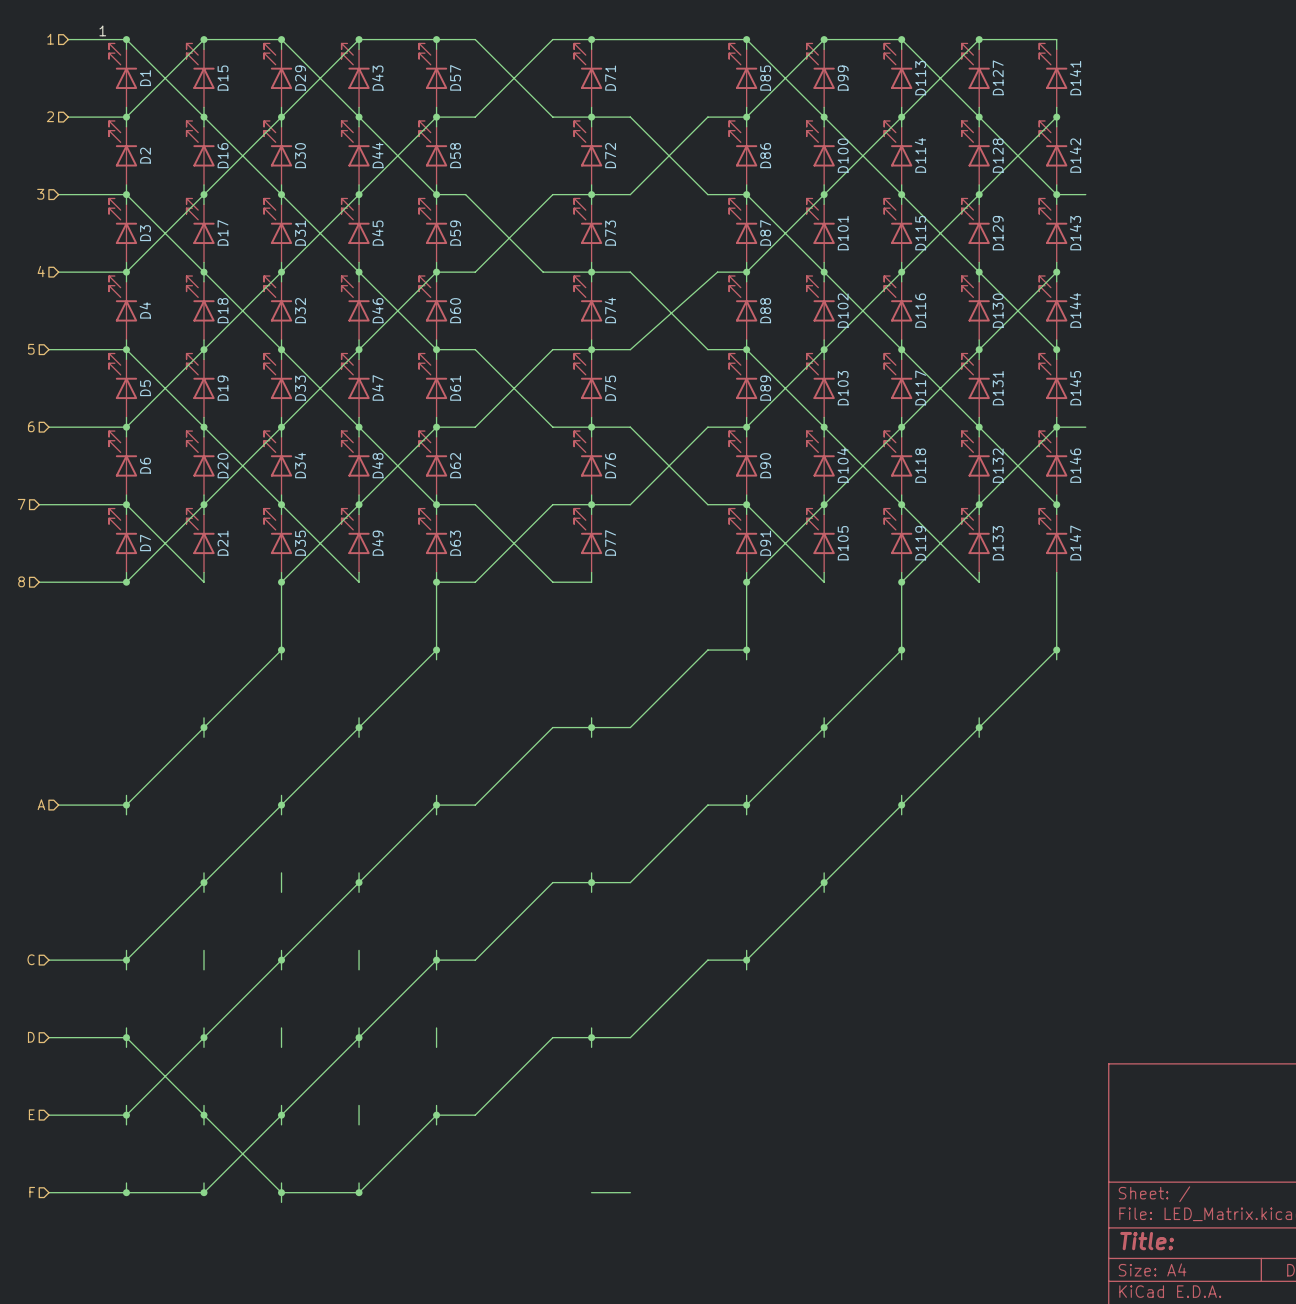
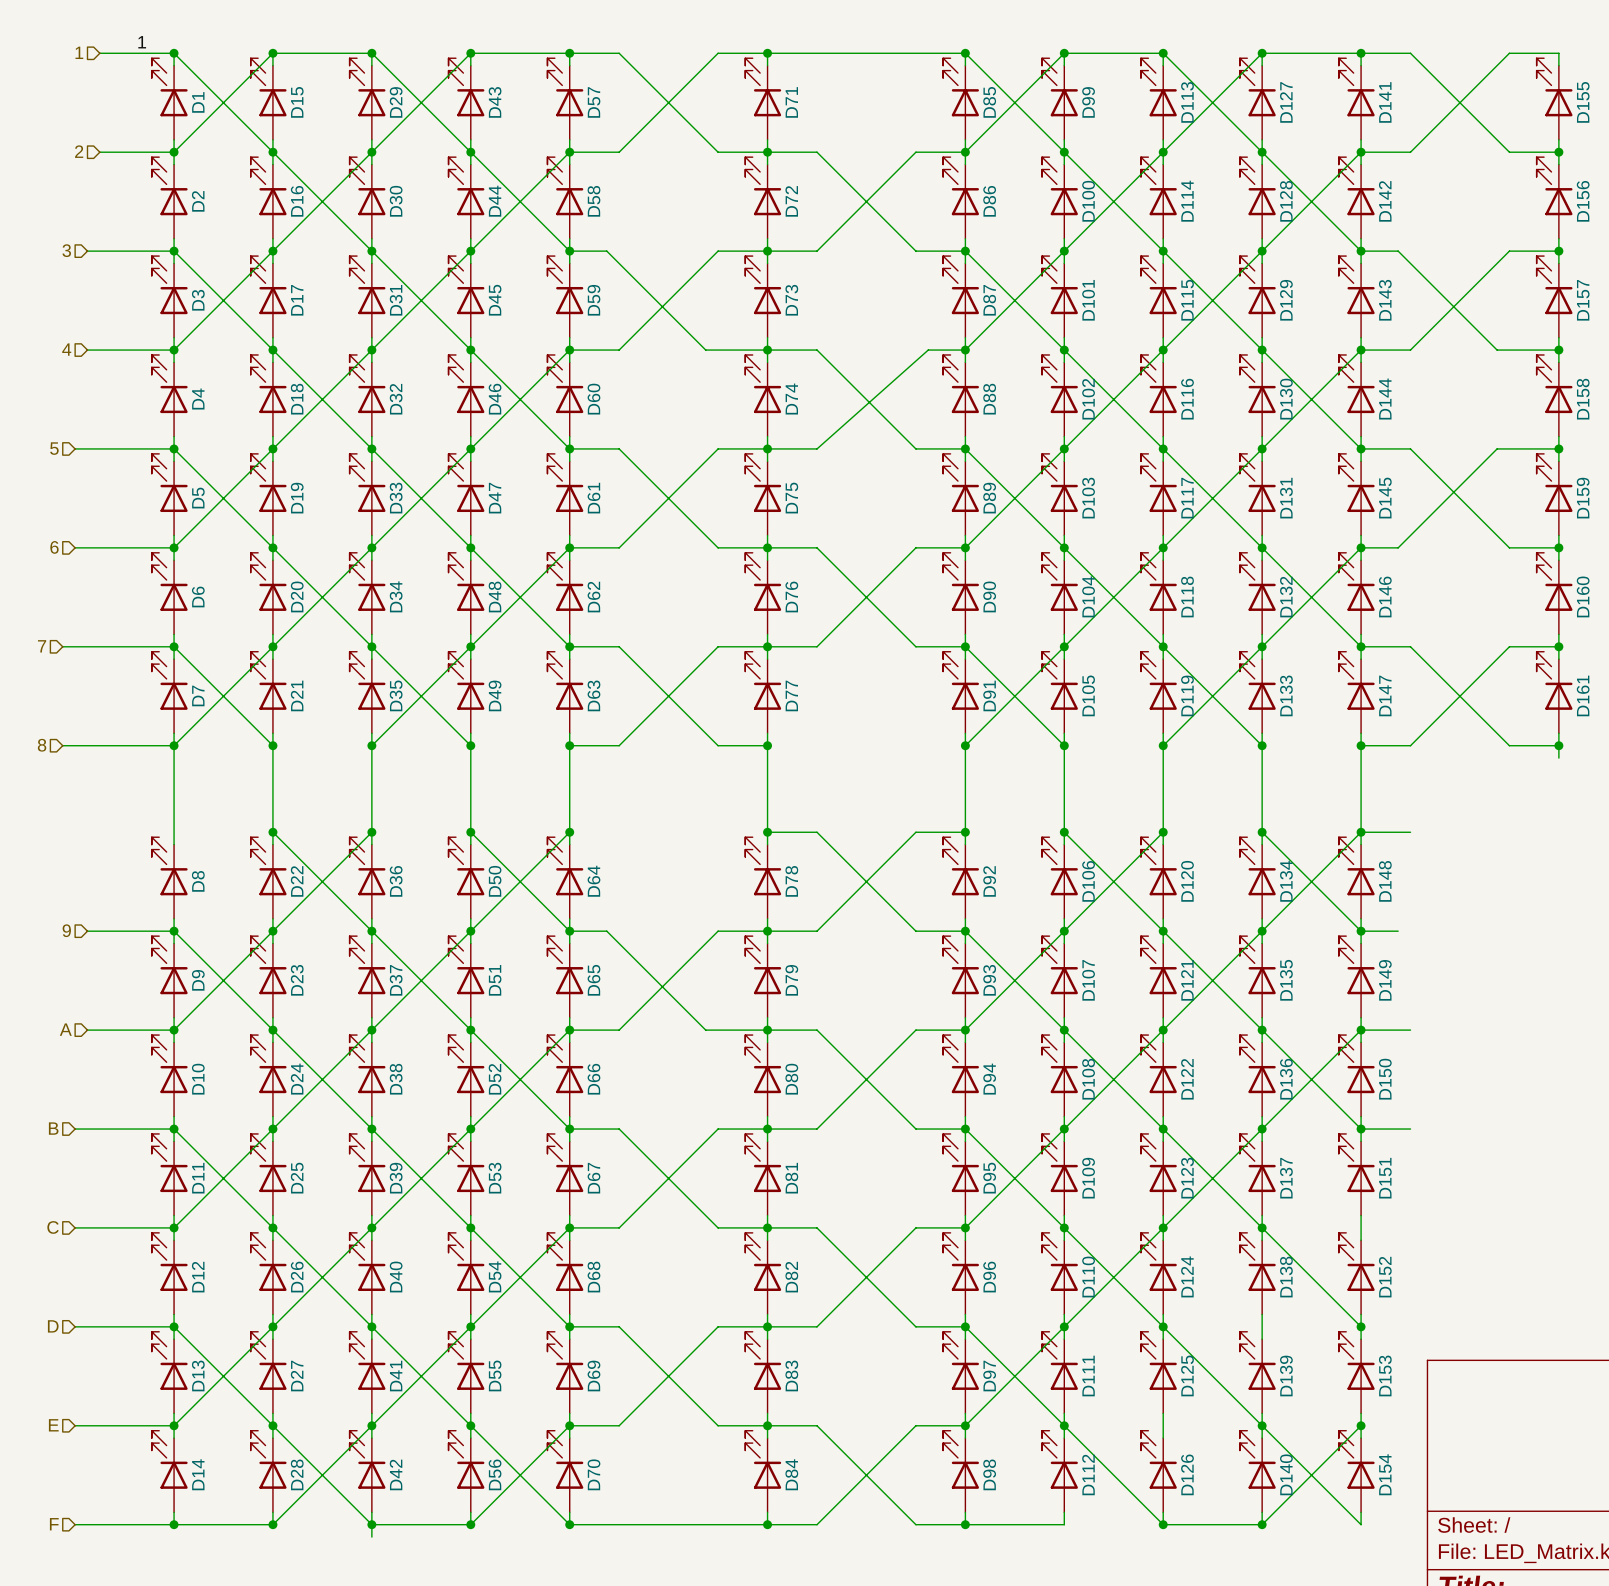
wire: none -> (1361, 53) (1410, 53) (1509, 152) (1558, 152)
junction: none -> (1361, 53)
wire: none -> (1558, 65) (1558, 53) (1509, 53) (1410, 152) (1361, 152)
D155: none -> (1554, 99)
wire: none -> (1558, 139) (1558, 164)
junction: none -> (1558, 152)
D156: none -> (1554, 197)
wire: none -> (1558, 238) (1558, 263)
wire: none -> (1398, 251) (1497, 350) (1558, 350)
wire: none -> (1558, 251) (1509, 251) (1410, 350) (1361, 350)
junction: none -> (1558, 251)
D157: none -> (1554, 296)
wire: none -> (1558, 337) (1558, 362)
junction: none -> (1558, 350)
D158: none -> (1554, 395)
wire: none -> (1558, 436) (1558, 461)
wire: none -> (1361, 448) (1410, 448) (1509, 547) (1558, 547)
wire: none -> (1558, 448) (1497, 448) (1398, 547)
junction: none -> (1558, 448)
D159: none -> (1554, 494)
wire: none -> (1558, 535) (1558, 560)
junction: none -> (1558, 547)
D160: none -> (1554, 593)
wire: none -> (1558, 634) (1558, 659)
wire: none -> (1361, 646) (1410, 646) (1509, 745) (1558, 745)
wire: none -> (1558, 646) (1509, 646) (1410, 745) (1361, 745)
junction: none -> (1558, 646)
D161: none -> (1554, 692)
wire: none -> (1558, 733) (1558, 758)
wire: none -> (174, 745) (174, 844)
wire: none -> (272, 745) (272, 844)
junction: none -> (272, 745)
wire: none -> (470, 745) (470, 844)
junction: none -> (470, 745)
wire: none -> (767, 745) (767, 844)
junction: none -> (767, 745)
wire: none -> (1064, 745) (1064, 844)
junction: none -> (1064, 745)
wire: none -> (1262, 745) (1262, 844)
junction: none -> (1262, 745)
junction: none -> (1361, 745)
junction: none -> (1558, 745)
wire: none -> (272, 832) (569, 1129) (619, 1129) (718, 1227) (817, 1227) (915, 1326) (965, 1326) (1163, 1524)
junction: none -> (272, 832)
wire: none -> (470, 832) (569, 931) (606, 931) (705, 1030) (817, 1030) (915, 1129) (965, 1129) (1361, 1524) (1361, 1512)
junction: none -> (470, 832)
wire: none -> (767, 832) (817, 832) (915, 931) (965, 931) (1361, 1326)
junction: none -> (767, 832)
wire: none -> (1064, 832) (1361, 1129) (1410, 1129)
junction: none -> (1064, 832)
wire: none -> (1262, 832) (1361, 931) (1398, 931)
junction: none -> (1262, 832)
wire: none -> (1361, 832) (1410, 832)
D8: none -> (169, 878)
D22: none -> (268, 878)
D36: none -> (367, 878)
D50: none -> (466, 878)
D64: none -> (565, 878)
D78: none -> (763, 878)
D92: none -> (961, 878)
D106: none -> (1059, 878)
D120: none -> (1158, 878)
D134: none -> (1257, 878)
D148: none -> (1356, 878)
wire: none -> (174, 918) (174, 943)
wire: none -> (371, 918) (371, 943)
wire: none -> (569, 918) (569, 943)
wire: none -> (965, 918) (965, 943)
wire: none -> (1163, 918) (1163, 943)
wire: none -> (1361, 918) (1361, 943)
hierarchical label: none -> 9 (66, 930)
wire: none -> (87, 931) (174, 931) (569, 1326) (619, 1326) (718, 1425) (817, 1425) (915, 1524) (1064, 1524) (1064, 1512)
junction: none -> (174, 931)
junction: none -> (371, 931)
junction: none -> (569, 931)
junction: none -> (965, 931)
junction: none -> (1163, 931)
junction: none -> (1361, 931)
D9: none -> (169, 976)
D23: none -> (268, 976)
D37: none -> (367, 976)
D51: none -> (466, 976)
D65: none -> (565, 976)
D79: none -> (763, 976)
D93: none -> (961, 976)
D107: none -> (1059, 976)
D121: none -> (1158, 976)
D135: none -> (1257, 976)
D149: none -> (1356, 976)
wire: none -> (272, 1017) (272, 1042)
wire: none -> (470, 1017) (470, 1042)
wire: none -> (767, 1017) (767, 1042)
wire: none -> (1064, 1017) (1064, 1042)
wire: none -> (1262, 1017) (1262, 1042)
wire: none -> (1361, 1017) (1361, 1042)
junction: none -> (272, 1030)
junction: none -> (470, 1030)
junction: none -> (767, 1030)
junction: none -> (1064, 1030)
junction: none -> (1262, 1030)
junction: none -> (1361, 1030)
wire: none -> (1410, 1030) (1361, 1030) (965, 1425) (915, 1425) (817, 1524)
D10: none -> (169, 1075)
D24: none -> (268, 1075)
D38: none -> (367, 1075)
D52: none -> (466, 1075)
D66: none -> (565, 1075)
D80: none -> (763, 1075)
D94: none -> (961, 1075)
D108: none -> (1059, 1075)
D122: none -> (1158, 1075)
D136: none -> (1257, 1075)
D150: none -> (1356, 1075)
wire: none -> (174, 1116) (174, 1141)
wire: none -> (569, 1116) (569, 1141)
wire: none -> (965, 1116) (965, 1141)
wire: none -> (1163, 1116) (1163, 1141)
wire: none -> (1262, 1116) (1262, 1141)
wire: none -> (1361, 1116) (1361, 1141)
hierarchical label: none -> B (53, 1128)
wire: none -> (75, 1129) (174, 1129) (569, 1524)
junction: none -> (174, 1129)
junction: none -> (371, 1129)
junction: none -> (569, 1129)
junction: none -> (965, 1129)
junction: none -> (1163, 1129)
junction: none -> (1262, 1129)
junction: none -> (1361, 1129)
D11: none -> (169, 1174)
D25: none -> (268, 1174)
D39: none -> (367, 1174)
D53: none -> (466, 1174)
D67: none -> (565, 1174)
D81: none -> (763, 1174)
D95: none -> (961, 1174)
D109: none -> (1059, 1174)
D123: none -> (1158, 1174)
D137: none -> (1257, 1174)
D151: none -> (1356, 1174)
wire: none -> (767, 1215) (767, 1240)
wire: none -> (1064, 1215) (1064, 1240)
wire: none -> (1163, 1215) (1163, 1240)
wire: none -> (1262, 1215) (1262, 1240)
wire: none -> (1361, 1215) (1361, 1240)
junction: none -> (272, 1227)
junction: none -> (470, 1227)
junction: none -> (767, 1227)
junction: none -> (1064, 1227)
junction: none -> (1163, 1227)
junction: none -> (1262, 1227)
D12: none -> (169, 1273)
D26: none -> (268, 1273)
D40: none -> (367, 1273)
D54: none -> (466, 1273)
D68: none -> (565, 1273)
D82: none -> (763, 1273)
D96: none -> (961, 1273)
D110: none -> (1059, 1273)
D124: none -> (1158, 1273)
D138: none -> (1257, 1273)
D152: none -> (1356, 1273)
wire: none -> (965, 1314) (965, 1339)
wire: none -> (1064, 1314) (1064, 1339)
wire: none -> (1163, 1314) (1163, 1339)
wire: none -> (1262, 1314) (1262, 1339)
wire: none -> (1361, 1314) (1361, 1339)
junction: none -> (371, 1326)
junction: none -> (569, 1326)
junction: none -> (965, 1326)
junction: none -> (1064, 1326)
junction: none -> (1163, 1326)
junction: none -> (1361, 1326)
D13: none -> (169, 1372)
D27: none -> (268, 1372)
D41: none -> (367, 1372)
D55: none -> (466, 1372)
D69: none -> (565, 1372)
D83: none -> (763, 1372)
D97: none -> (961, 1372)
D111: none -> (1059, 1372)
D125: none -> (1158, 1372)
D139: none -> (1257, 1372)
D153: none -> (1356, 1372)
wire: none -> (767, 1413) (767, 1438)
wire: none -> (965, 1413) (965, 1438)
wire: none -> (1064, 1413) (1064, 1438)
wire: none -> (1163, 1413) (1163, 1438)
wire: none -> (1262, 1413) (1262, 1438)
wire: none -> (1361, 1413) (1361, 1438)
junction: none -> (470, 1425)
junction: none -> (767, 1425)
junction: none -> (965, 1425)
junction: none -> (1064, 1425)
junction: none -> (1262, 1425)
wire: none -> (1361, 1425) (1262, 1524)
junction: none -> (1361, 1425)
D14: none -> (169, 1471)
D28: none -> (268, 1471)
D42: none -> (367, 1471)
D56: none -> (466, 1471)
D70: none -> (565, 1471)
D84: none -> (763, 1471)
D98: none -> (961, 1471)
D112: none -> (1059, 1471)
D126: none -> (1158, 1471)
D140: none -> (1257, 1471)
D154: none -> (1356, 1471)
wire: none -> (569, 1512) (569, 1524)
wire: none -> (767, 1512) (767, 1524) (569, 1524)
wire: none -> (965, 1512) (965, 1524)
wire: none -> (1163, 1512) (1163, 1524)
wire: none -> (1262, 1512) (1262, 1524)
junction: none -> (569, 1524)
junction: none -> (767, 1524)
junction: none -> (965, 1524)
wire: none -> (1163, 1524) (1262, 1524)
junction: none -> (1163, 1524)
junction: none -> (1262, 1524)

